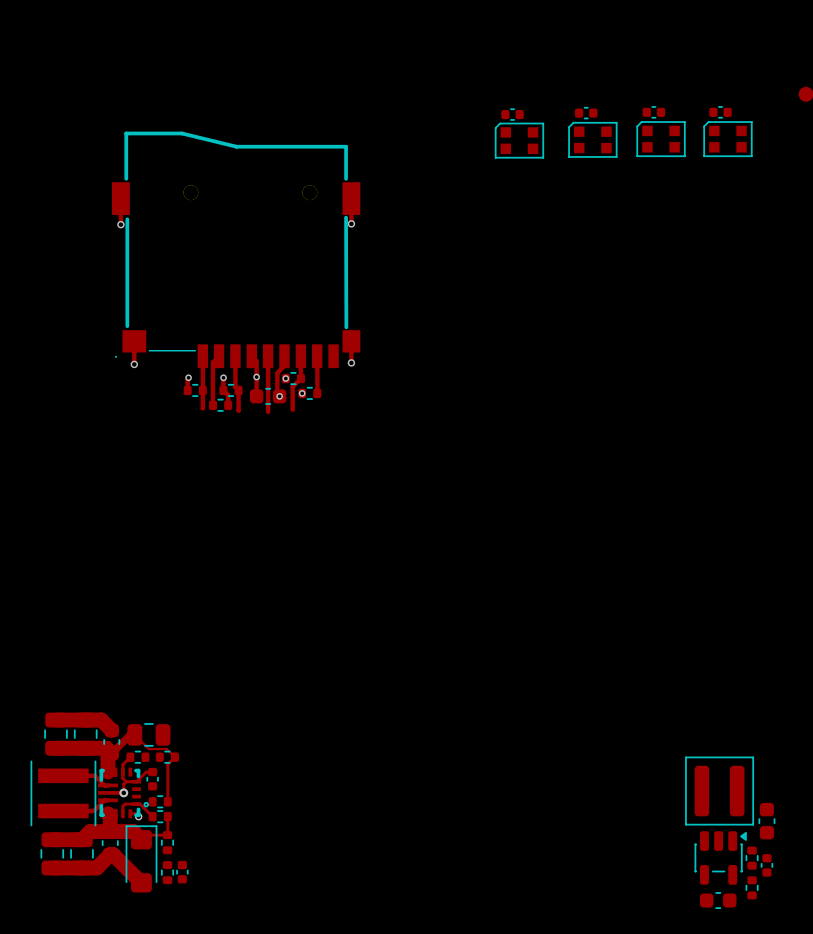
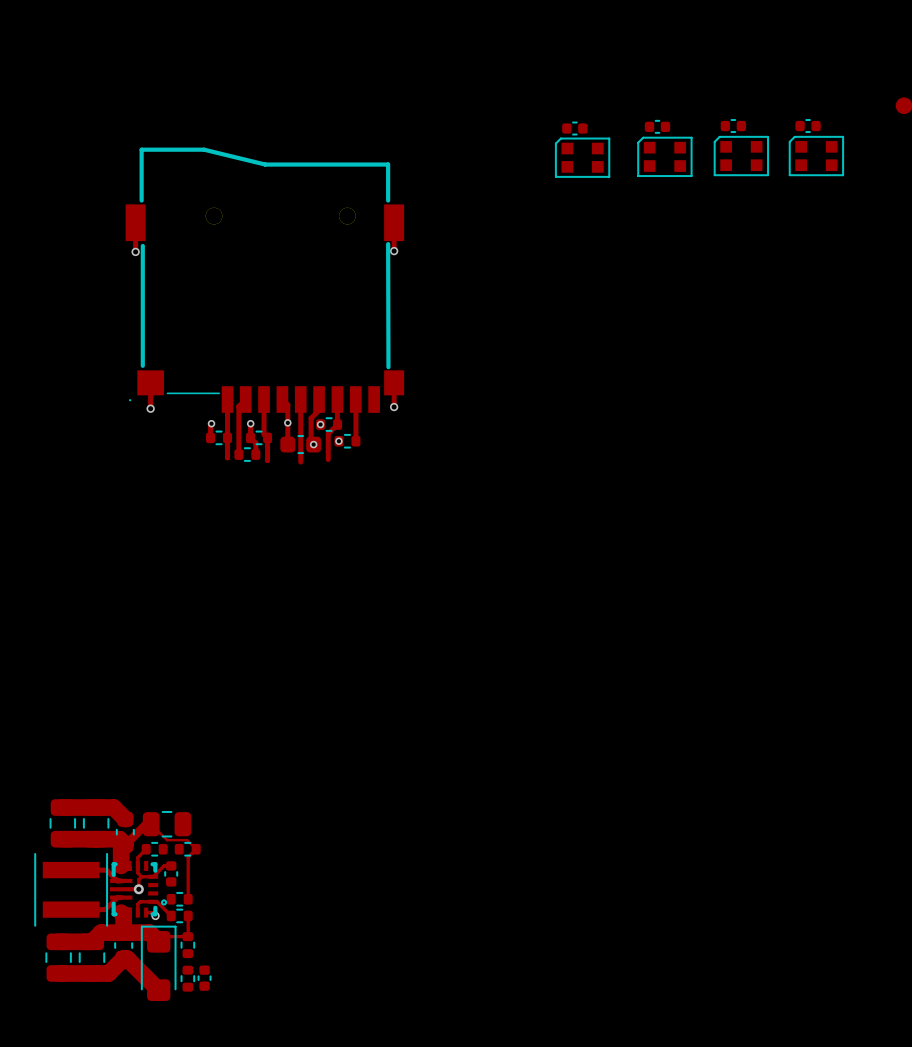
part: (719, 791) -> none
part: (766, 821) -> none
part: (720, 857) -> none
part: (752, 858) -> none
part: (766, 865) -> none
part: (752, 887) -> none
part: (718, 900) -> none

